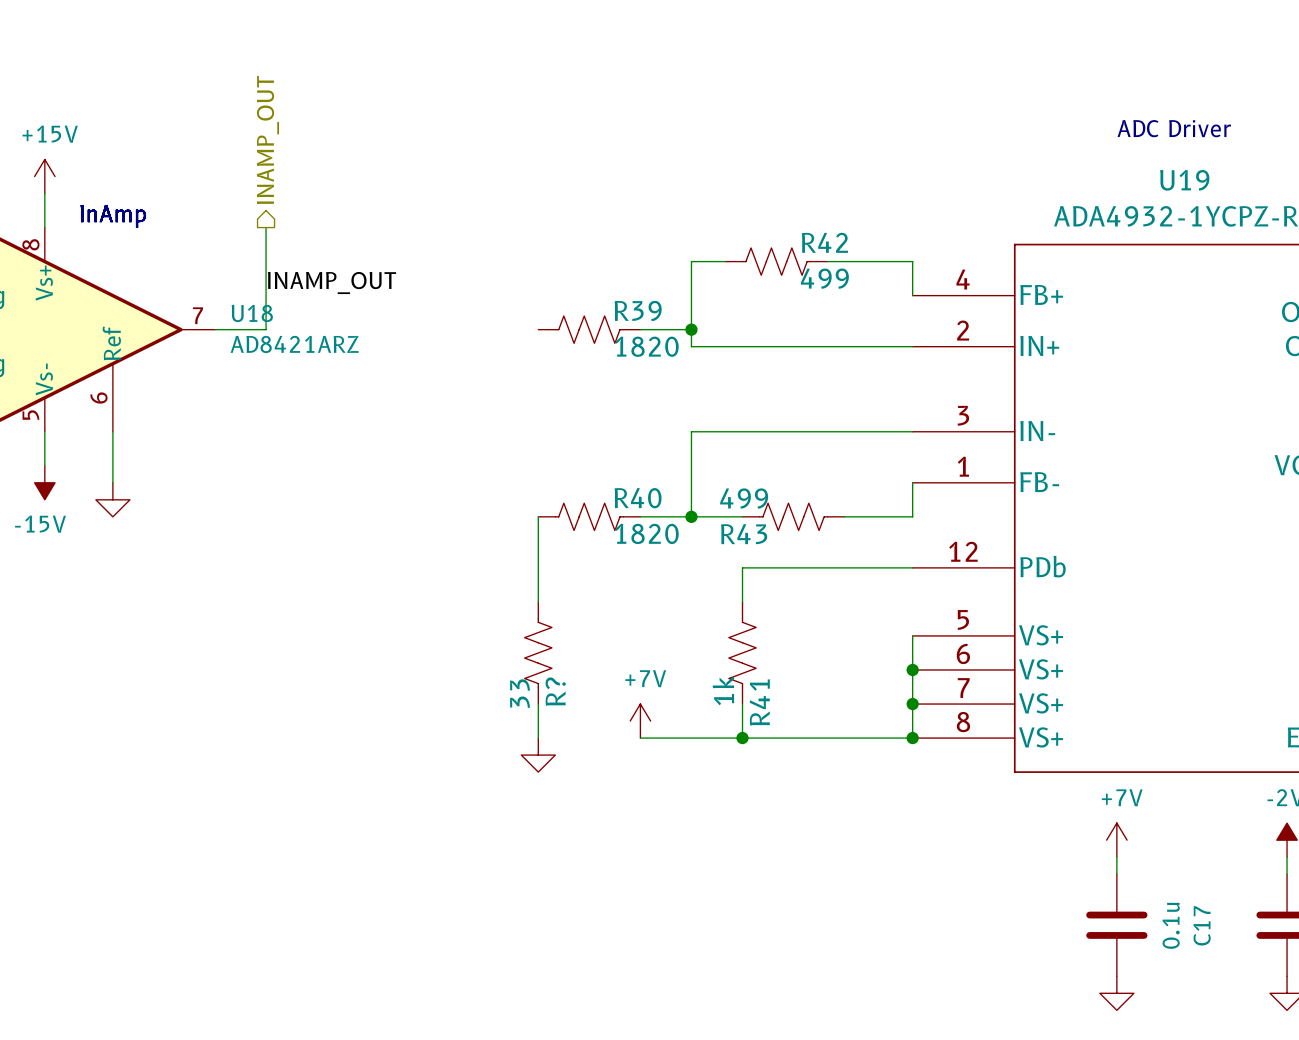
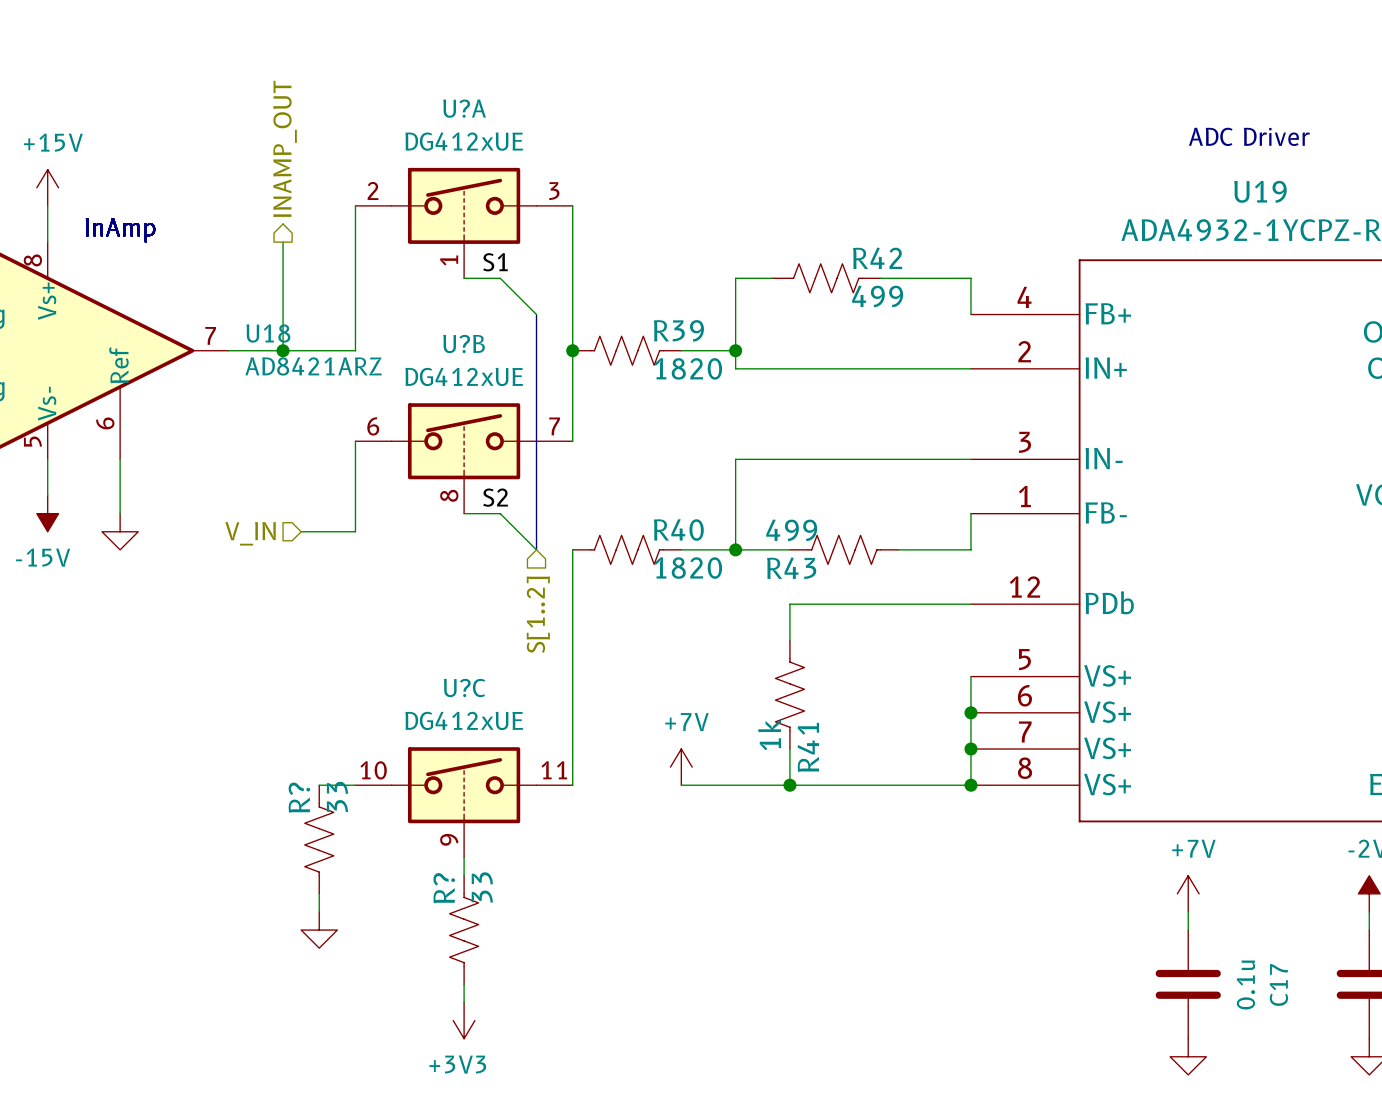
wire: none -> (355, 205) (355, 350) (283, 350)
wire: none -> (572, 205) (572, 441)
U?A: none -> DG412xUE (464, 223)
label: none -> S1 (495, 262)
wire: none -> (464, 278) (500, 278) (536, 314)
label: INAMP_OUT (331, 282) -> none
bus: none -> (536, 314) (536, 549)
junction: none -> (283, 350)
junction: none -> (572, 350)
wire: none -> (355, 441) (355, 531) (301, 531)
U?B: none -> DG412xUE (464, 458)
label: none -> S2 (495, 497)
wire: none -> (464, 513) (500, 513) (536, 549)
hierarchical label: none -> V_IN (250, 533)
hierarchical label: none -> S[1..2] (538, 614)
wire: none -> (572, 640) (572, 749)
R?: 33 (538, 652) -> none
wire: none -> (319, 785) (355, 785)
U?C: none -> DG412xUE (464, 802)
power symbol position: (538, 755) -> (319, 930)
R?: none -> 33 (319, 839)
wire: none -> (464, 857) (464, 875)
wire: none -> (319, 893) (319, 911)
R?: none -> 33 (464, 930)
wire: none -> (464, 984) (464, 1002)
power symbol: none -> +3V3 (464, 1020)

